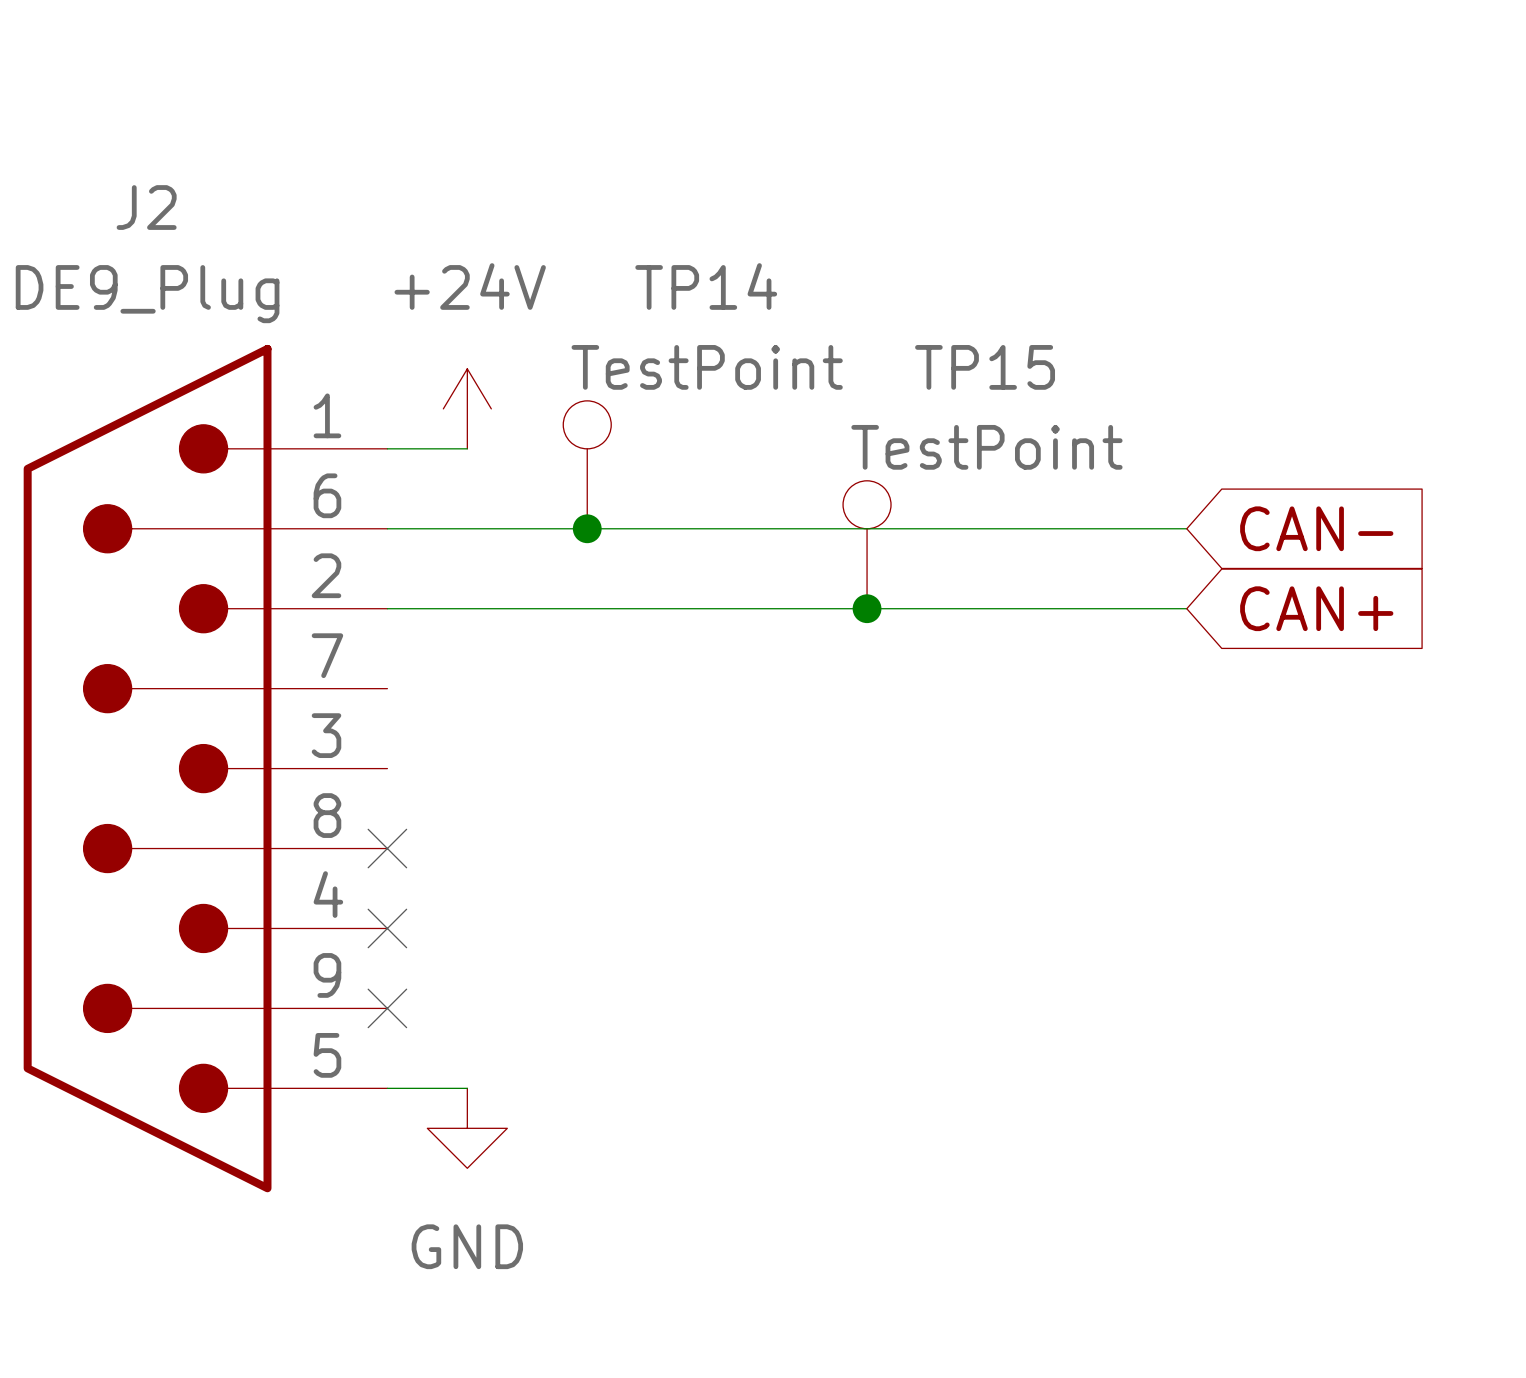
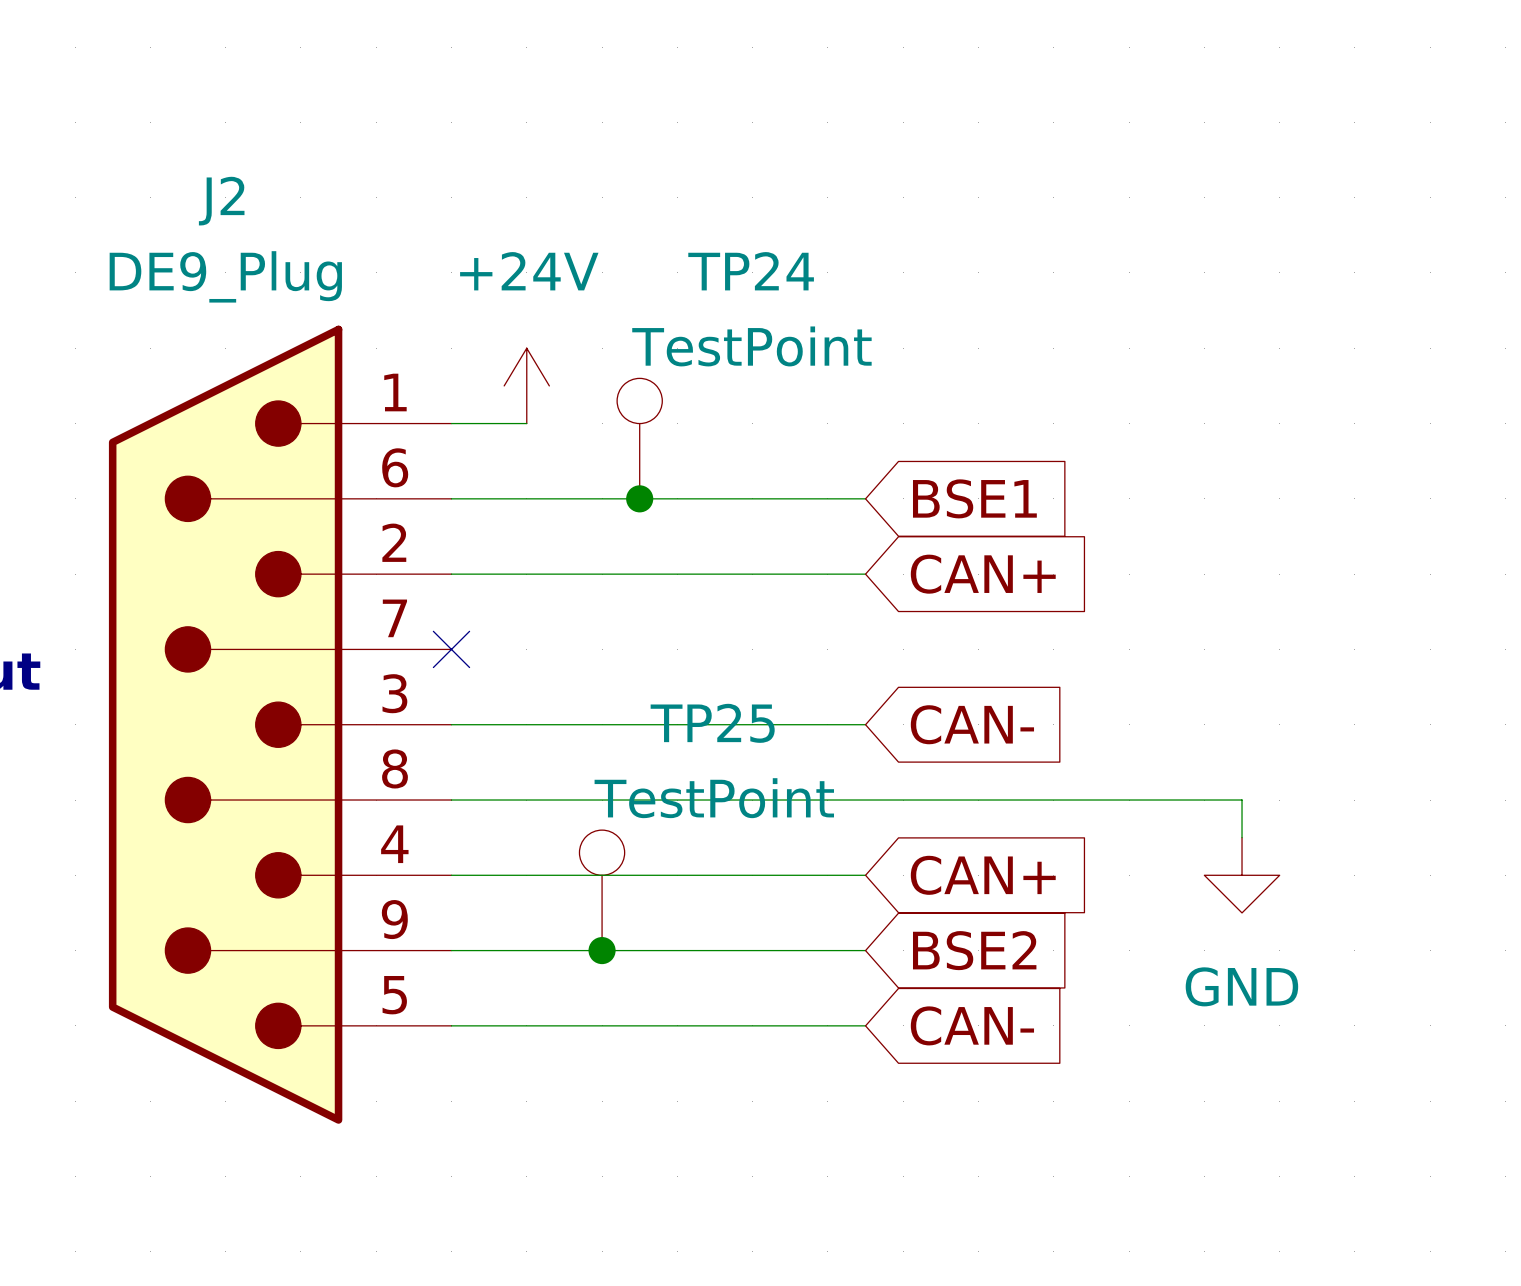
TP14 name: TP14 (706, 286) -> TP24 (751, 271)
wire: (827, 528) (1186, 528) -> none
global label: none -> BSE1 (974, 498)
global label: CAN- (1316, 528) -> none
TP15: TestPoint (867, 544) -> none
wire: (827, 608) (1186, 608) -> (526, 1025) (865, 1025)
junction: (867, 608) -> none
global label: none -> CAN+ (983, 574)
global label: CAN+ (1316, 608) -> none
no-connect mark: none -> (451, 649)
wire: none -> (451, 724) (865, 724)
global label: none -> CAN- (972, 724)
wire: none -> (451, 800) (1242, 800) (1242, 837)
no-connect mark: (387, 848) -> none
wire: none -> (451, 875) (865, 875)
no-connect mark: (387, 928) -> none
global label: none -> CAN+ (983, 875)
TP25: none -> TestPoint (602, 890)
wire: none -> (451, 950) (865, 950)
no-connect mark: (387, 1008) -> none
junction: none -> (602, 950)
global label: none -> BSE2 (974, 950)
global label: none -> CAN- (972, 1025)
power symbol position: GND (467, 1128) -> GND (1242, 875)

